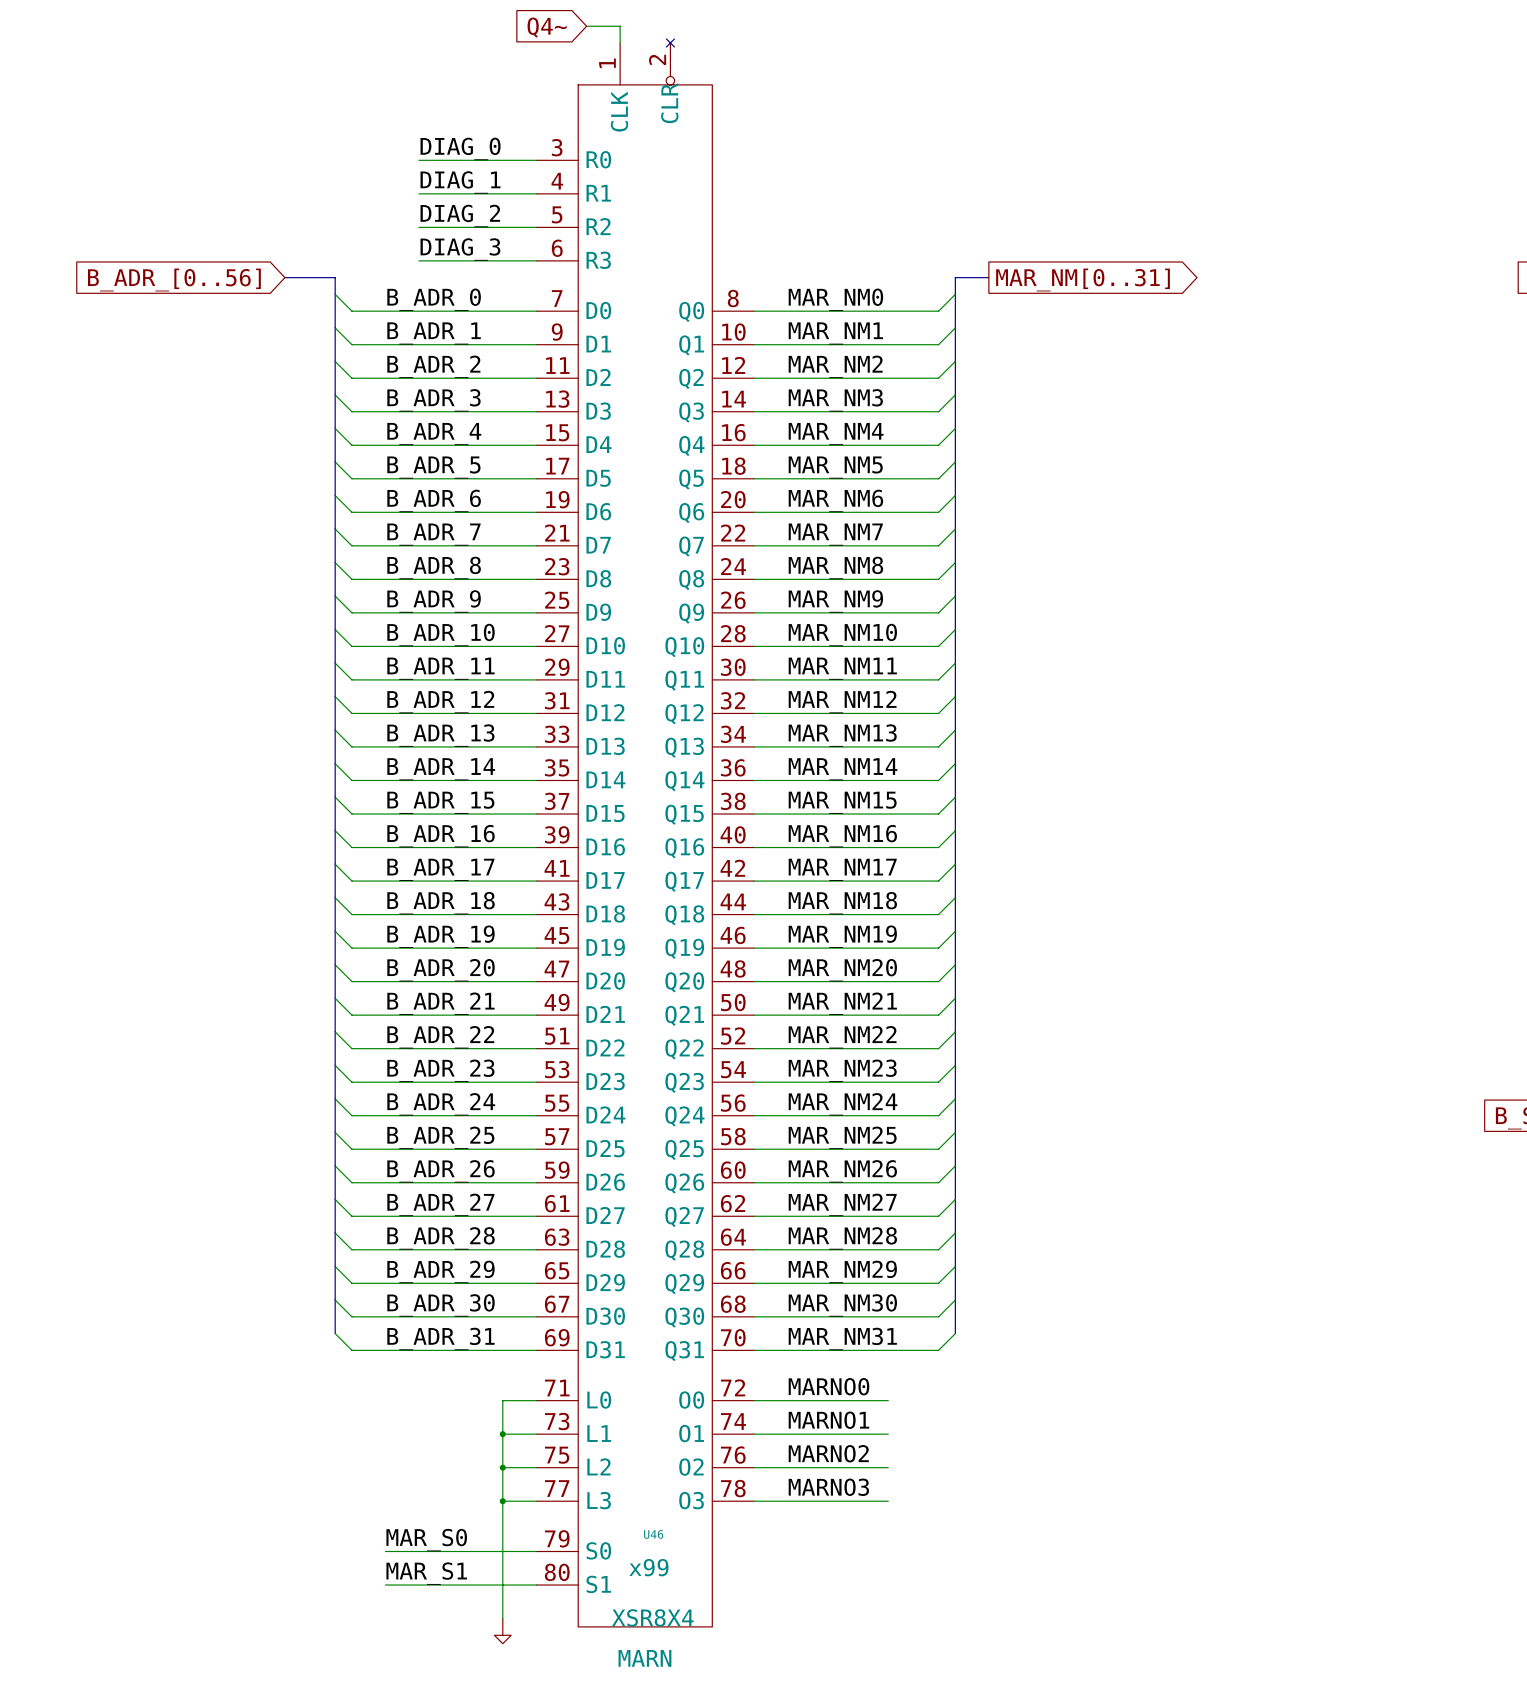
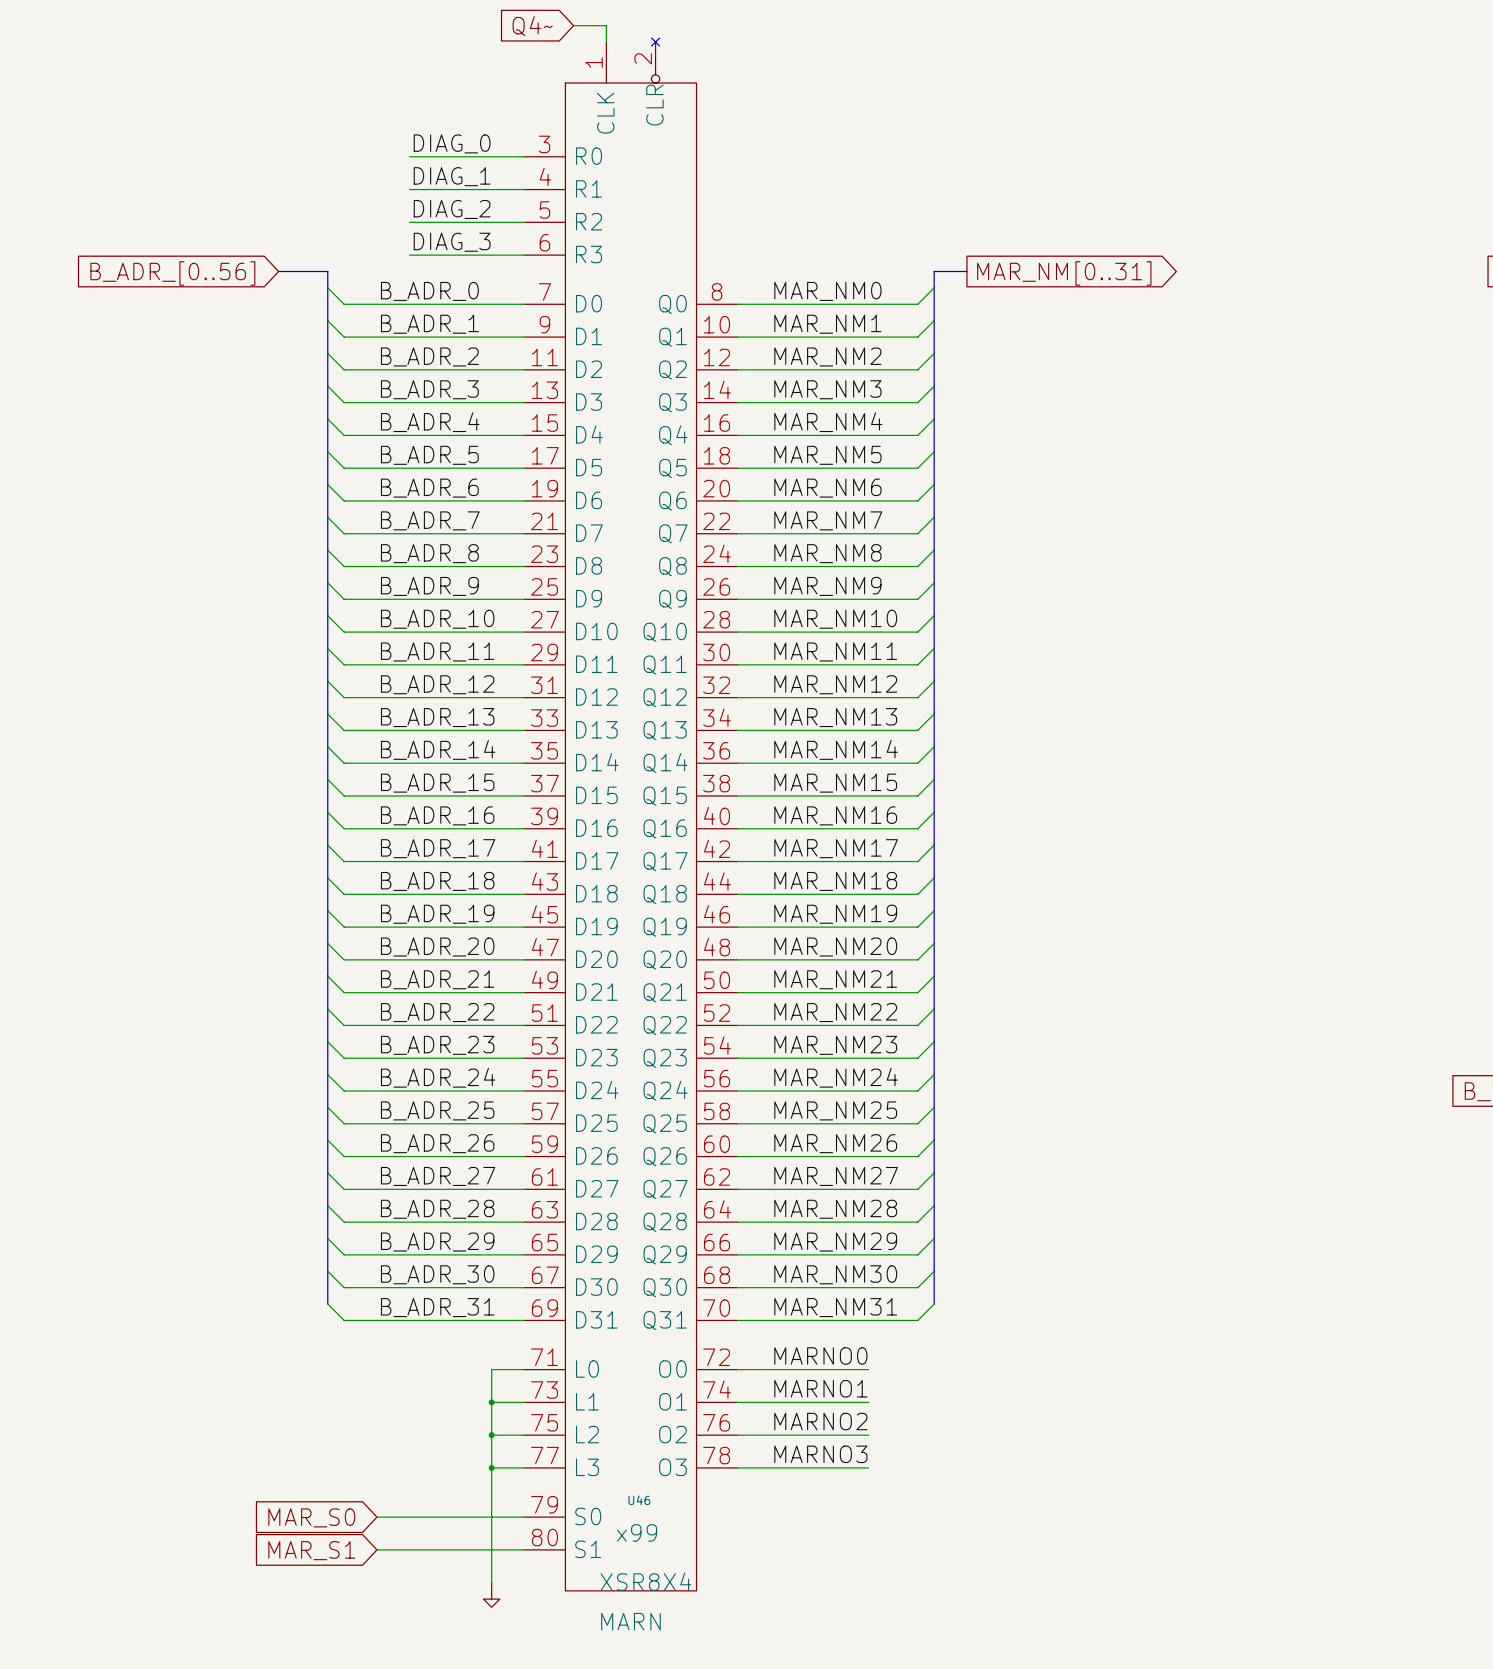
label: MAR_S0 (426, 1540) -> none
global label: none -> MAR_S0 (311, 1517)
label: MAR_S1 (426, 1573) -> none
global label: none -> MAR_S1 (311, 1550)

